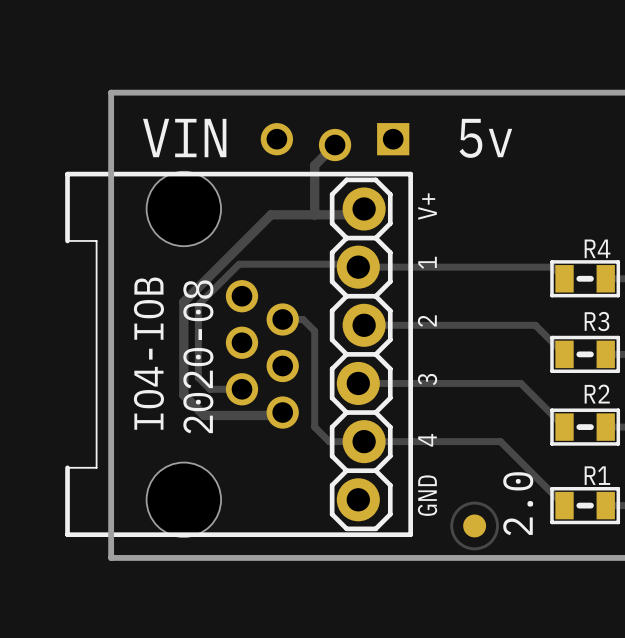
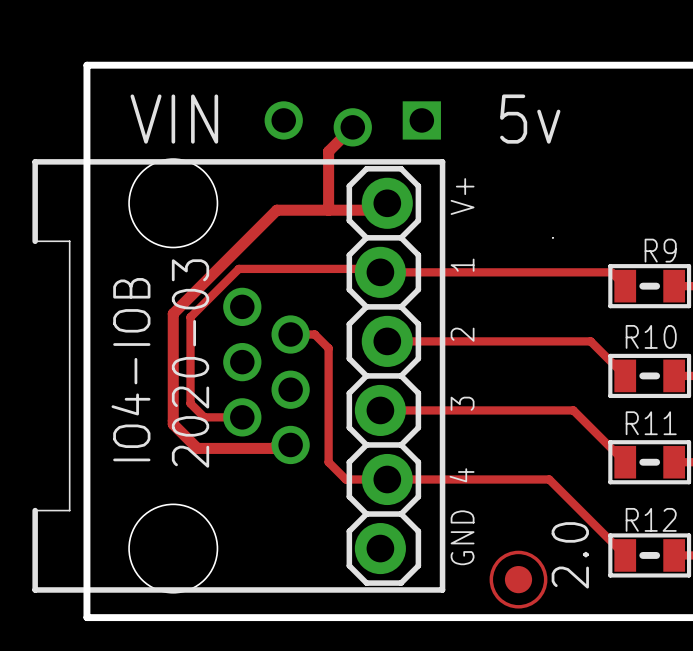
R4 name: R4 (597, 248) -> R9 (660, 250)
R3 name: R3 (597, 321) -> R10 (651, 336)
text: 2020-08 (198, 356) -> 2020-03 (190, 363)
R2 name: R2 (597, 394) -> R11 (651, 423)
R1 name: R1 (597, 475) -> R12 (651, 519)

